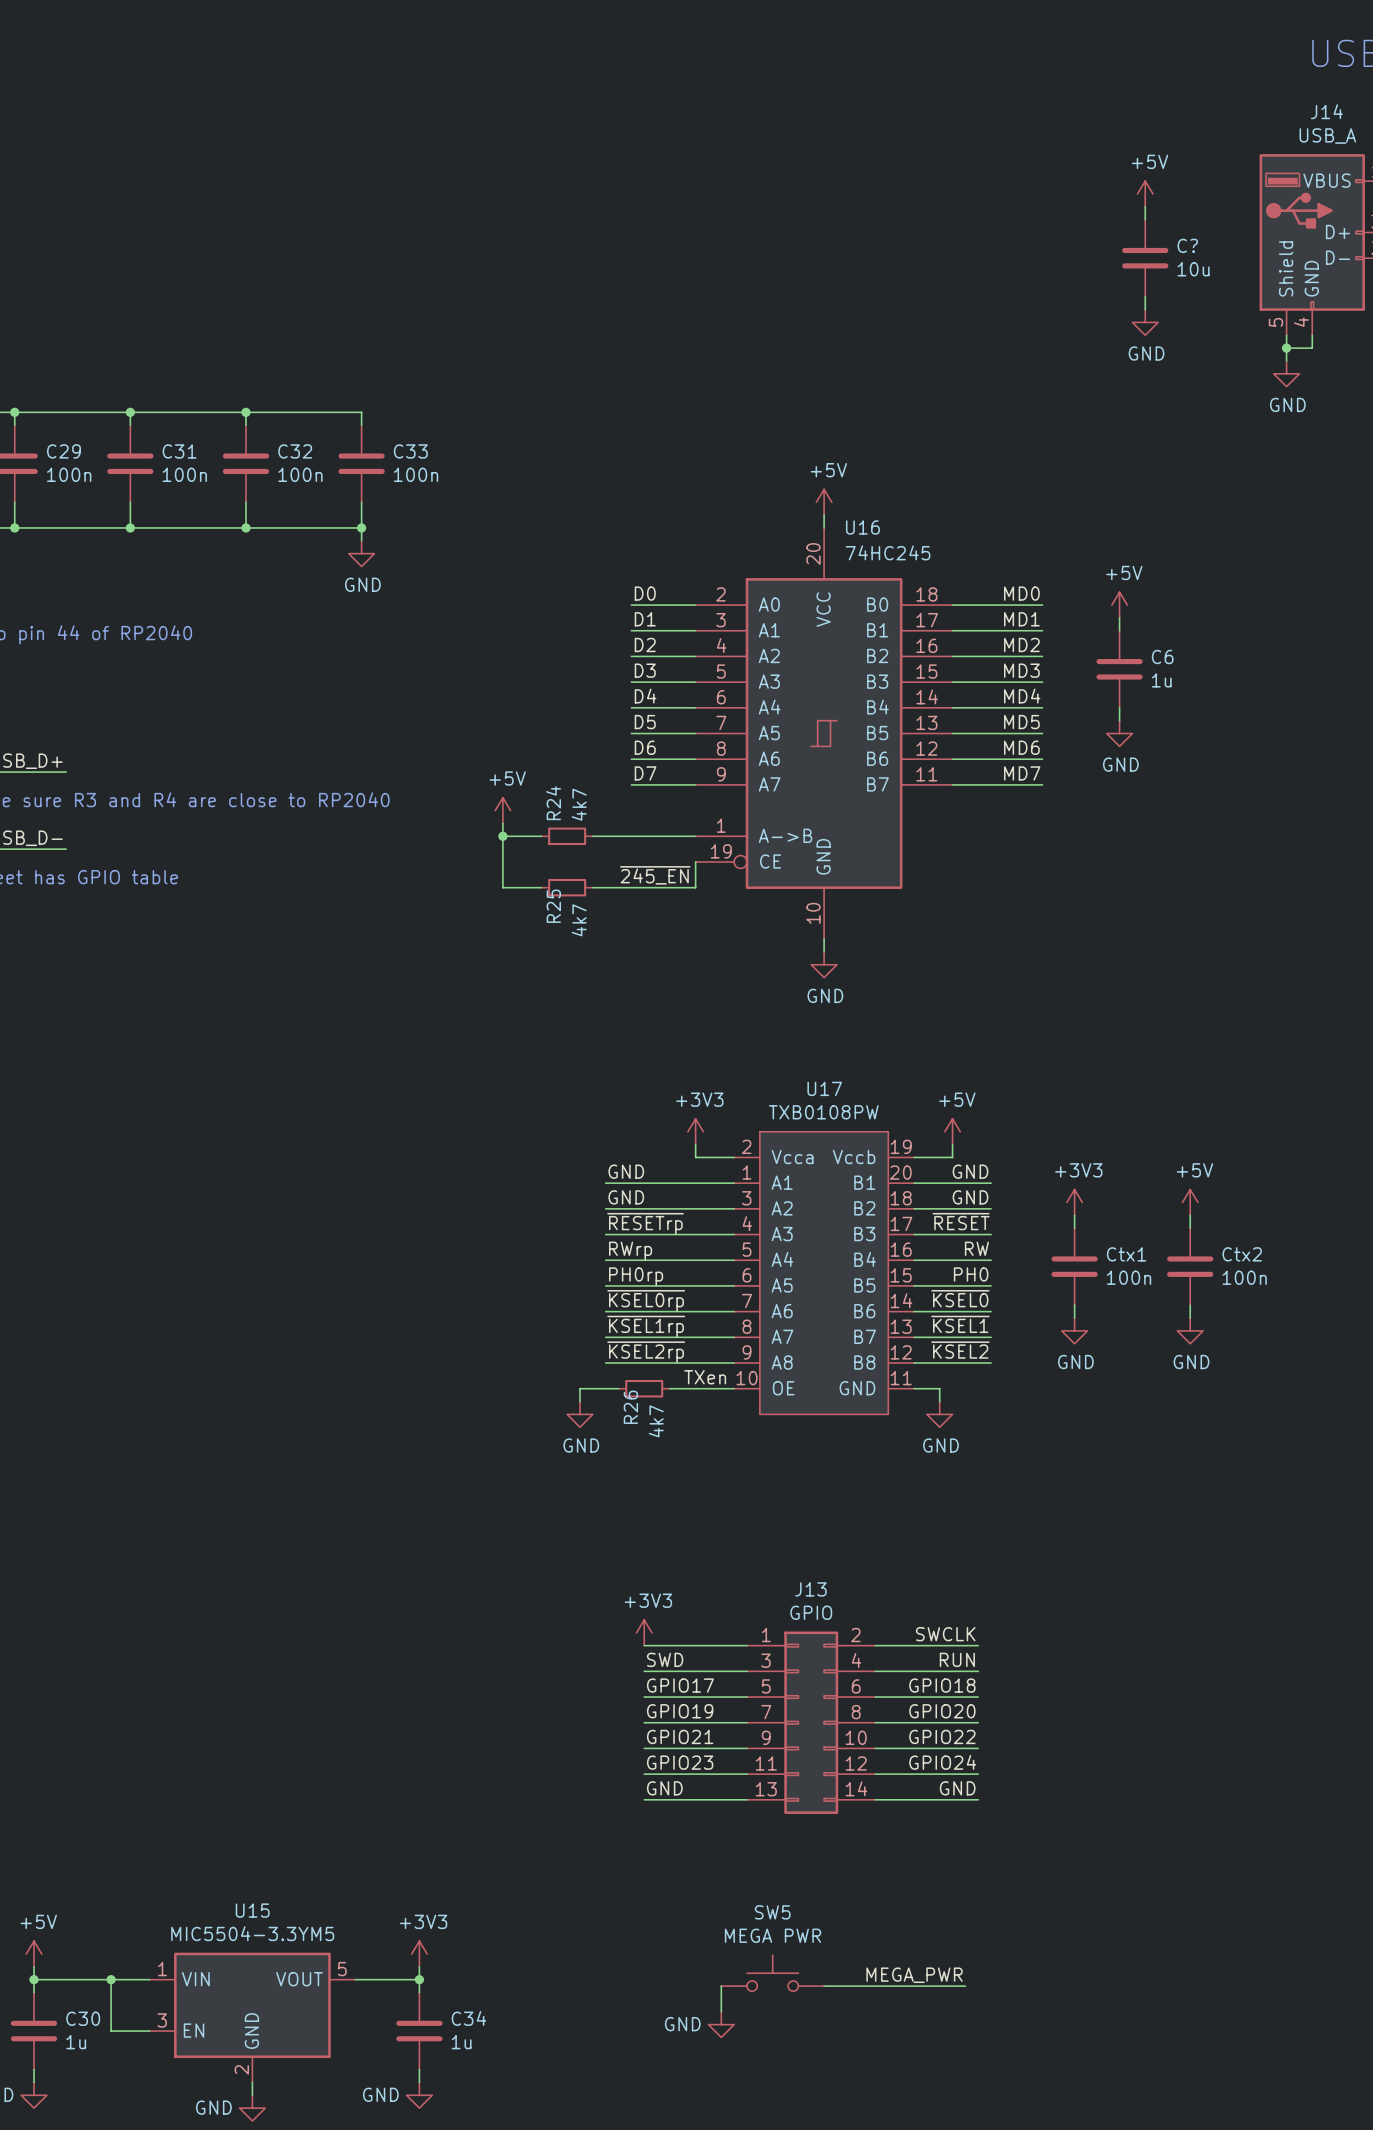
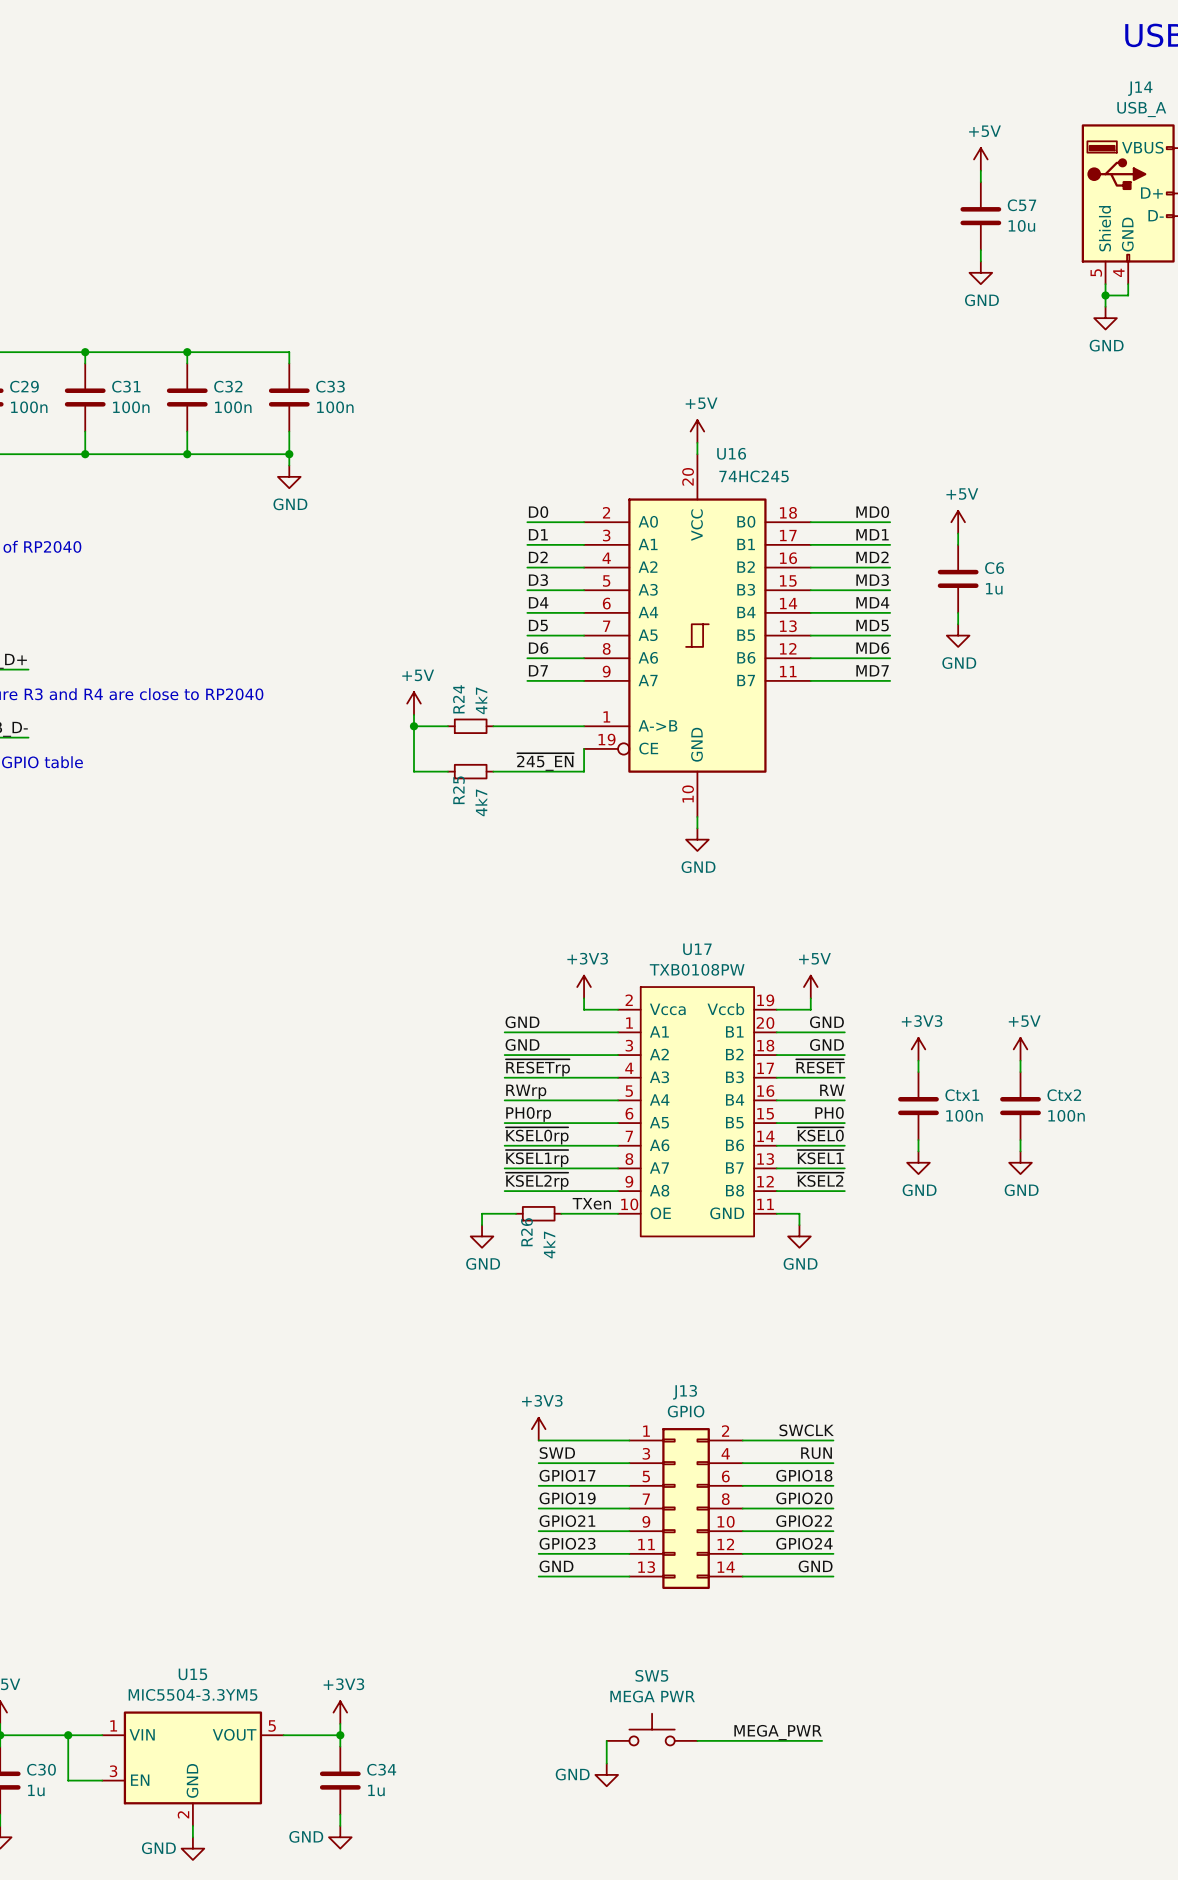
C? name: C? (1187, 245) -> C57 (1022, 205)

